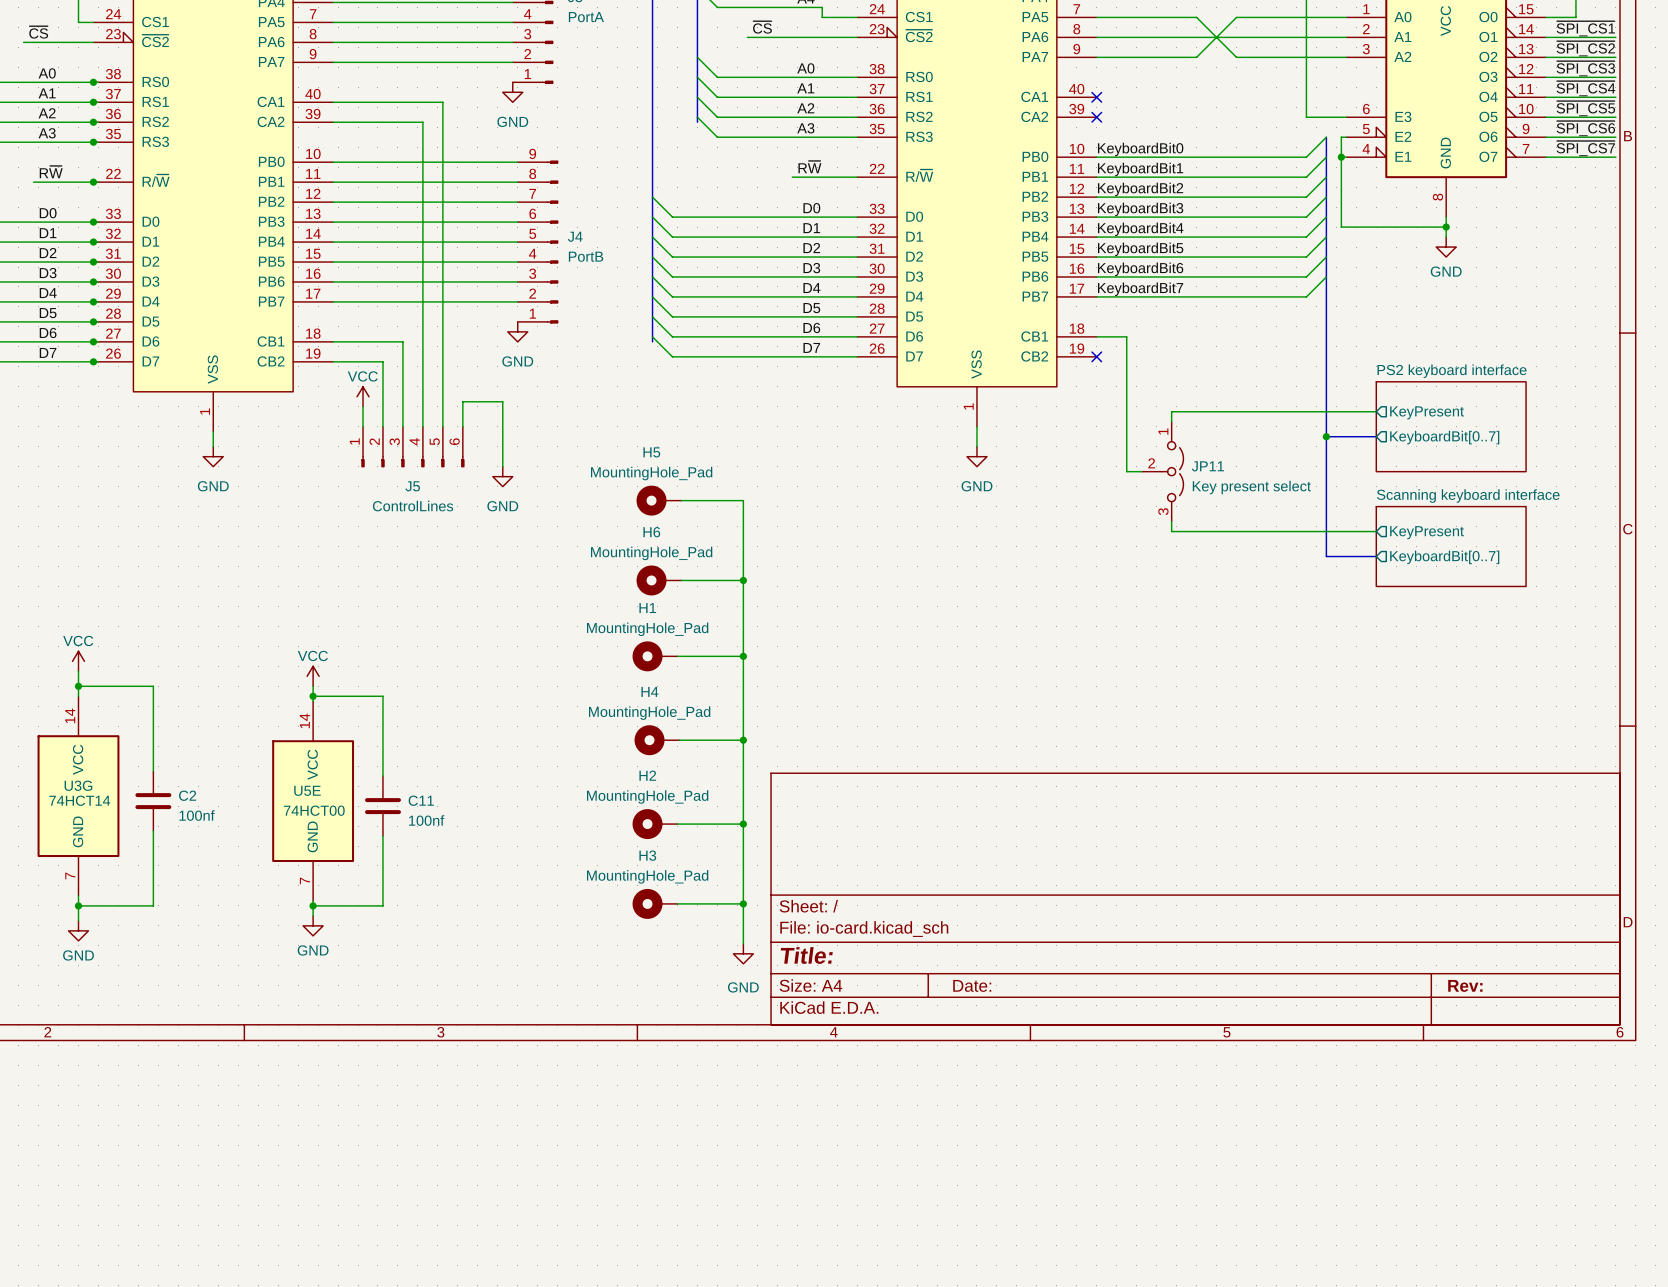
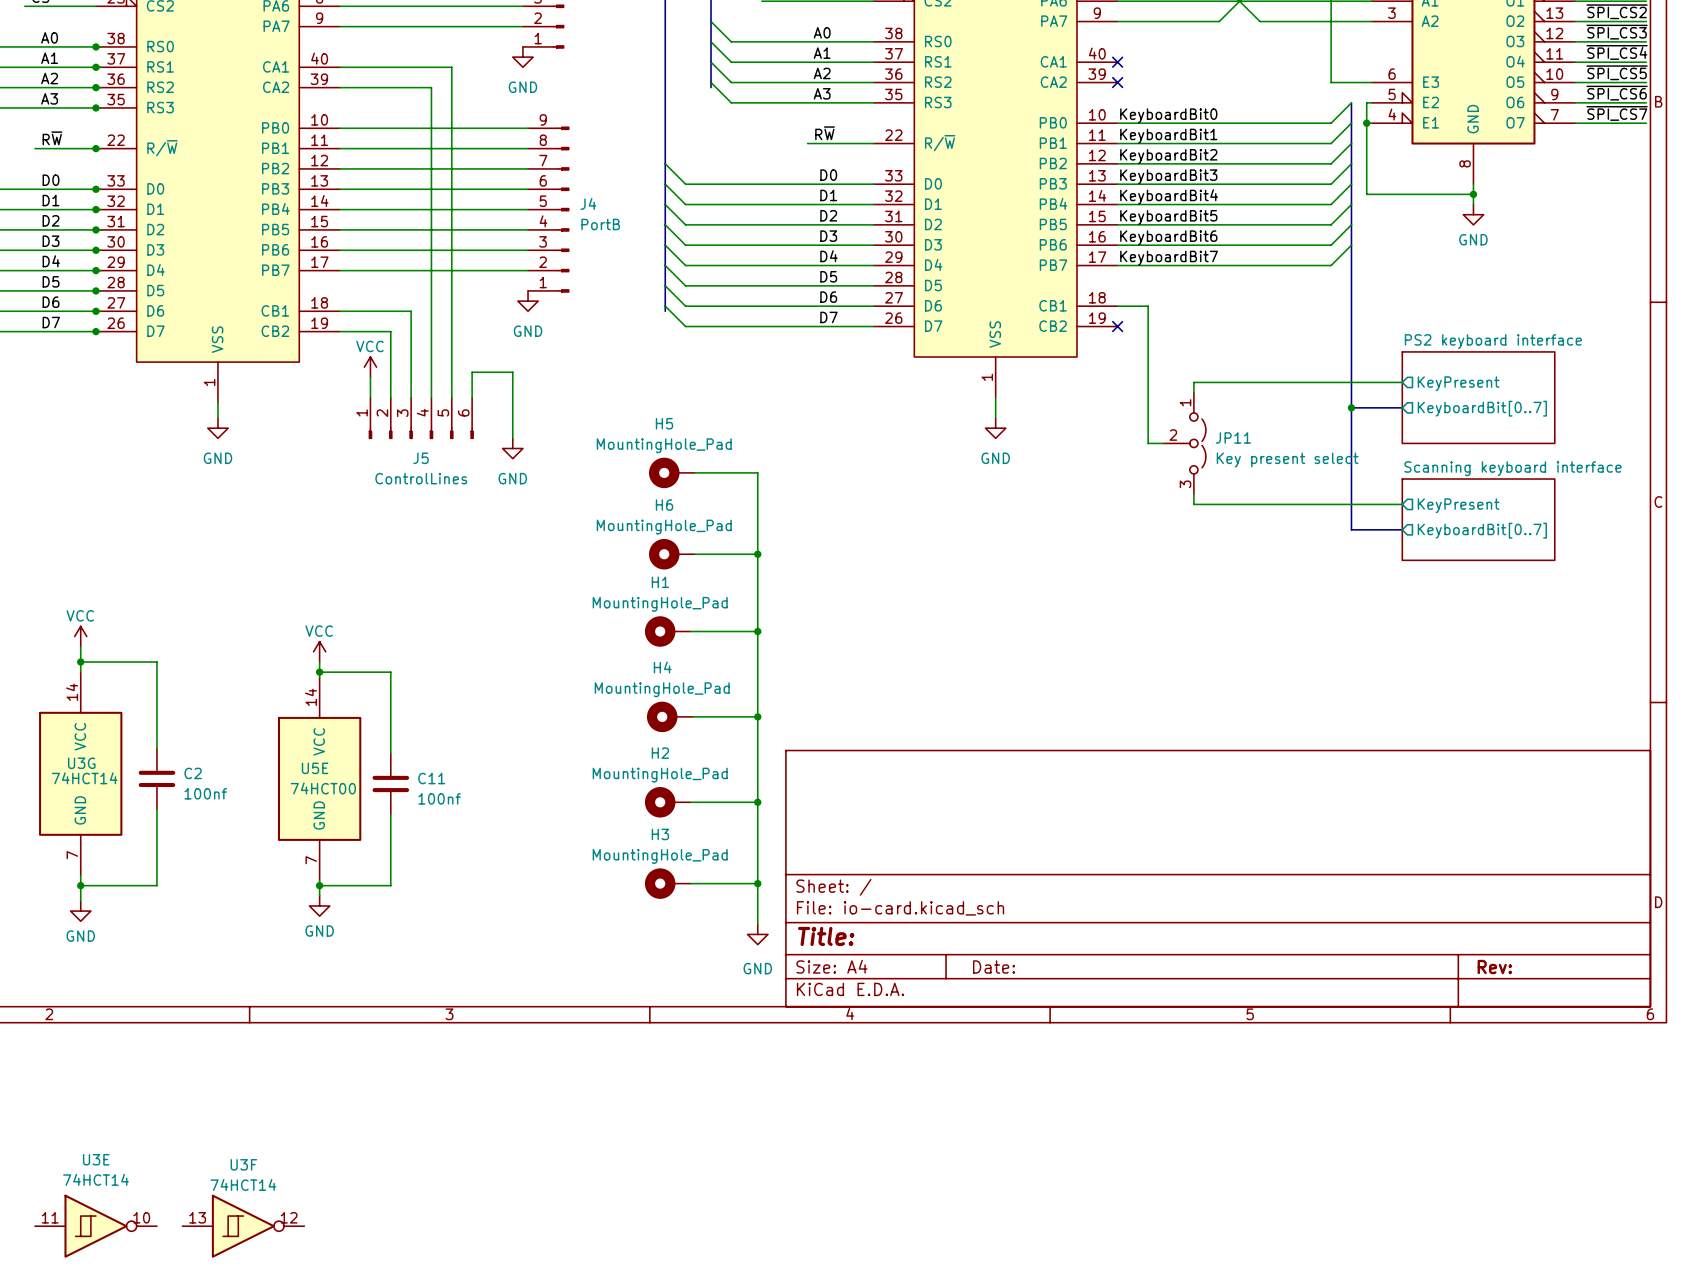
U3E: none -> 74HCT14 (95, 1226)
U3F: none -> 74HCT14 (243, 1226)

